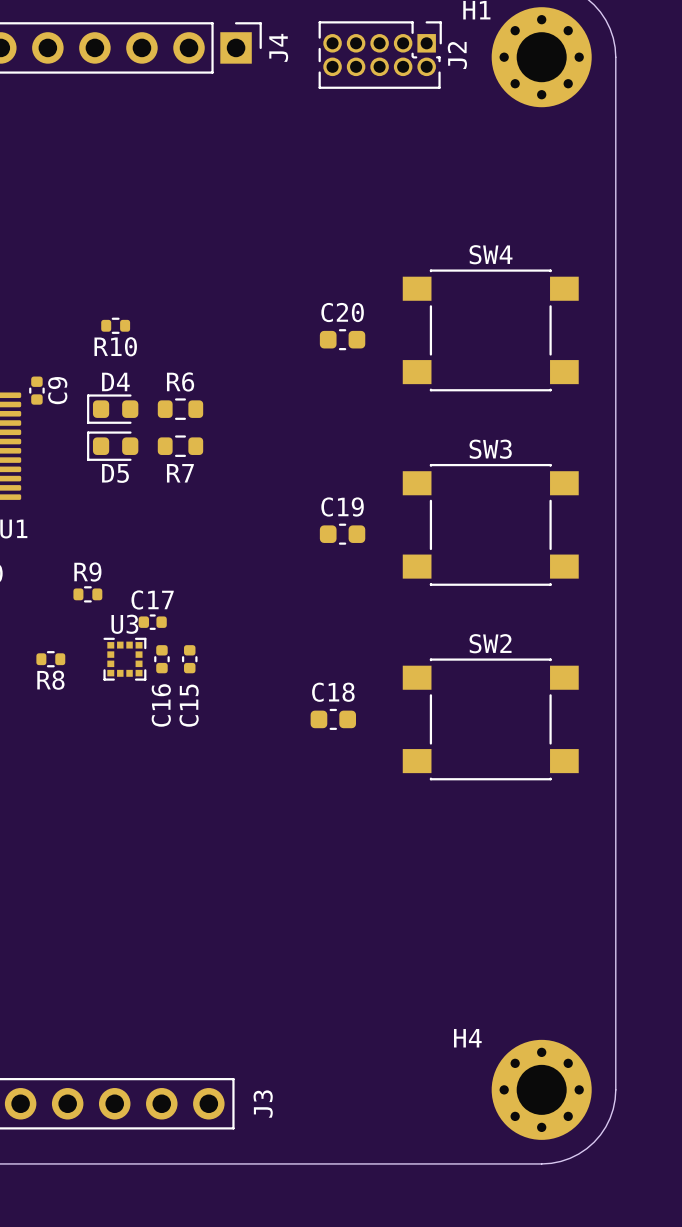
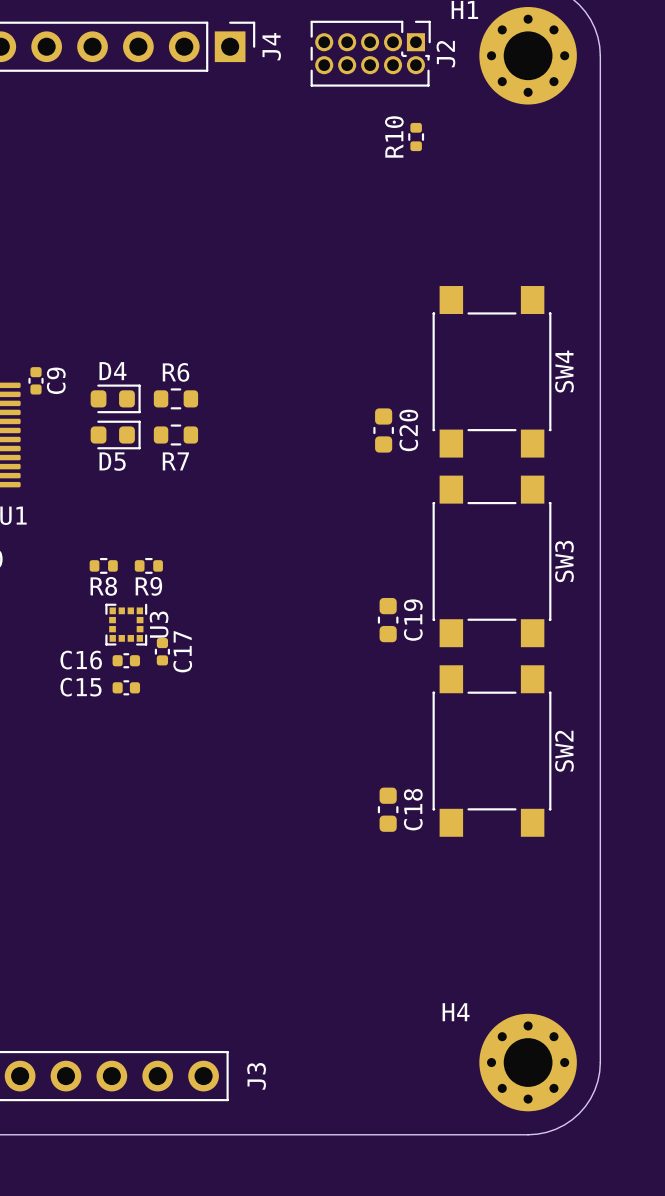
R10 rotation: 0° (115, 325) -> 90° clockwise (416, 137)
R10 position: (115, 325) -> (416, 137)
SW4 rotation: 0° (490, 330) -> 90° clockwise (491, 371)
C20 rotation: 0° (342, 339) -> 90° clockwise (383, 430)
C20 position: (342, 339) -> (383, 430)
D4 rotation: 0° (112, 409) -> 180° (115, 398)
D5 rotation: 0° (112, 446) -> 180° (115, 434)
SW3 rotation: 0° (490, 524) -> 90° clockwise (491, 561)
C19 rotation: 0° (342, 534) -> 90° clockwise (388, 620)
C19 position: (342, 534) -> (388, 620)
R9 name position: R9 (87, 572) -> R9 (148, 586)
R9 position: (87, 594) -> (148, 565)
C17 rotation: 0° (152, 622) -> 90° clockwise (162, 651)
C17 position: (152, 622) -> (162, 651)
R8 position: (50, 659) -> (103, 565)
U3 rotation: 0° (124, 659) -> 90° clockwise (126, 624)
C16 rotation: 0° (161, 659) -> 90° clockwise (126, 660)
C16 position: (161, 659) -> (126, 660)
C15 rotation: 0° (189, 659) -> 90° clockwise (126, 687)
C15 position: (189, 659) -> (126, 687)
C18 rotation: 0° (333, 719) -> 90° clockwise (388, 809)
C18 position: (333, 719) -> (388, 809)
SW2 rotation: 0° (490, 719) -> 90° clockwise (491, 751)

